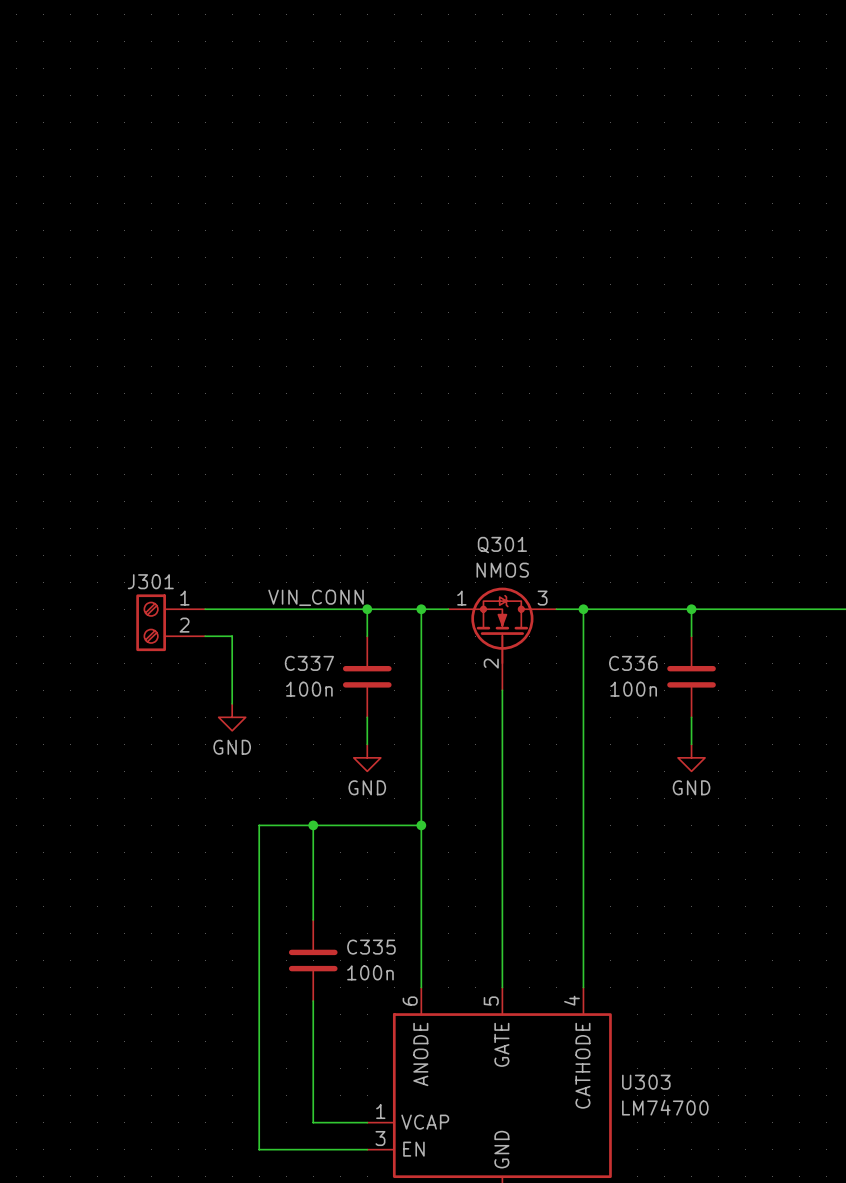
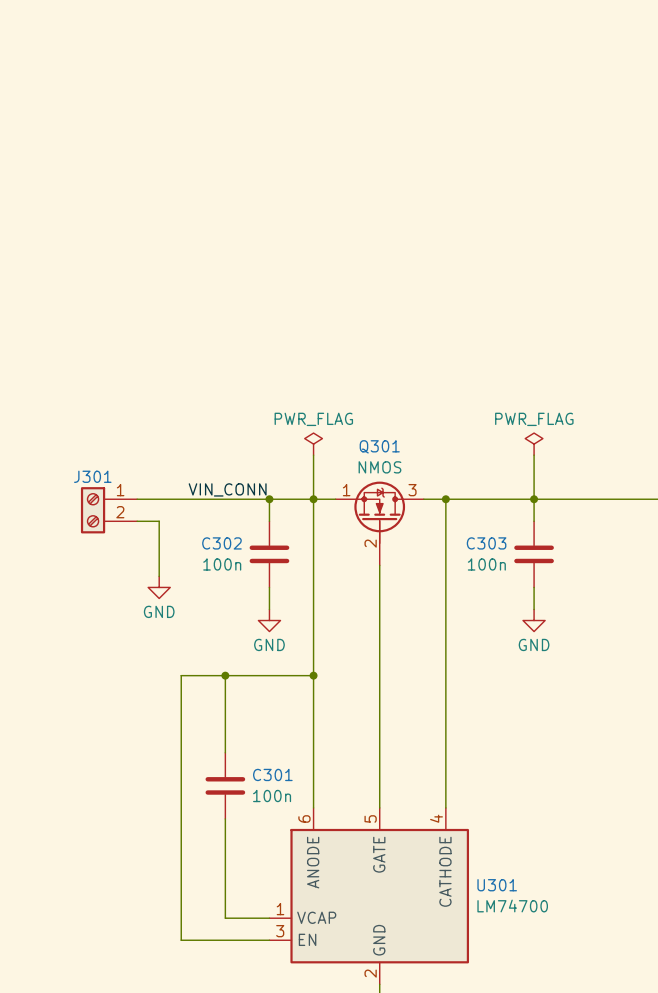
power symbol: none -> PWR_FLAG (313, 444)
power symbol: none -> PWR_FLAG (534, 444)
wire: none -> (313, 455) (313, 499)
wire: none -> (534, 455) (534, 499)
C337 name: C337 (309, 663) -> C302 (221, 543)
C336 name: C336 (633, 663) -> C303 (486, 543)
C335 name: C335 (371, 947) -> C301 (272, 774)
U303 name: U303 (646, 1082) -> U301 (497, 885)

